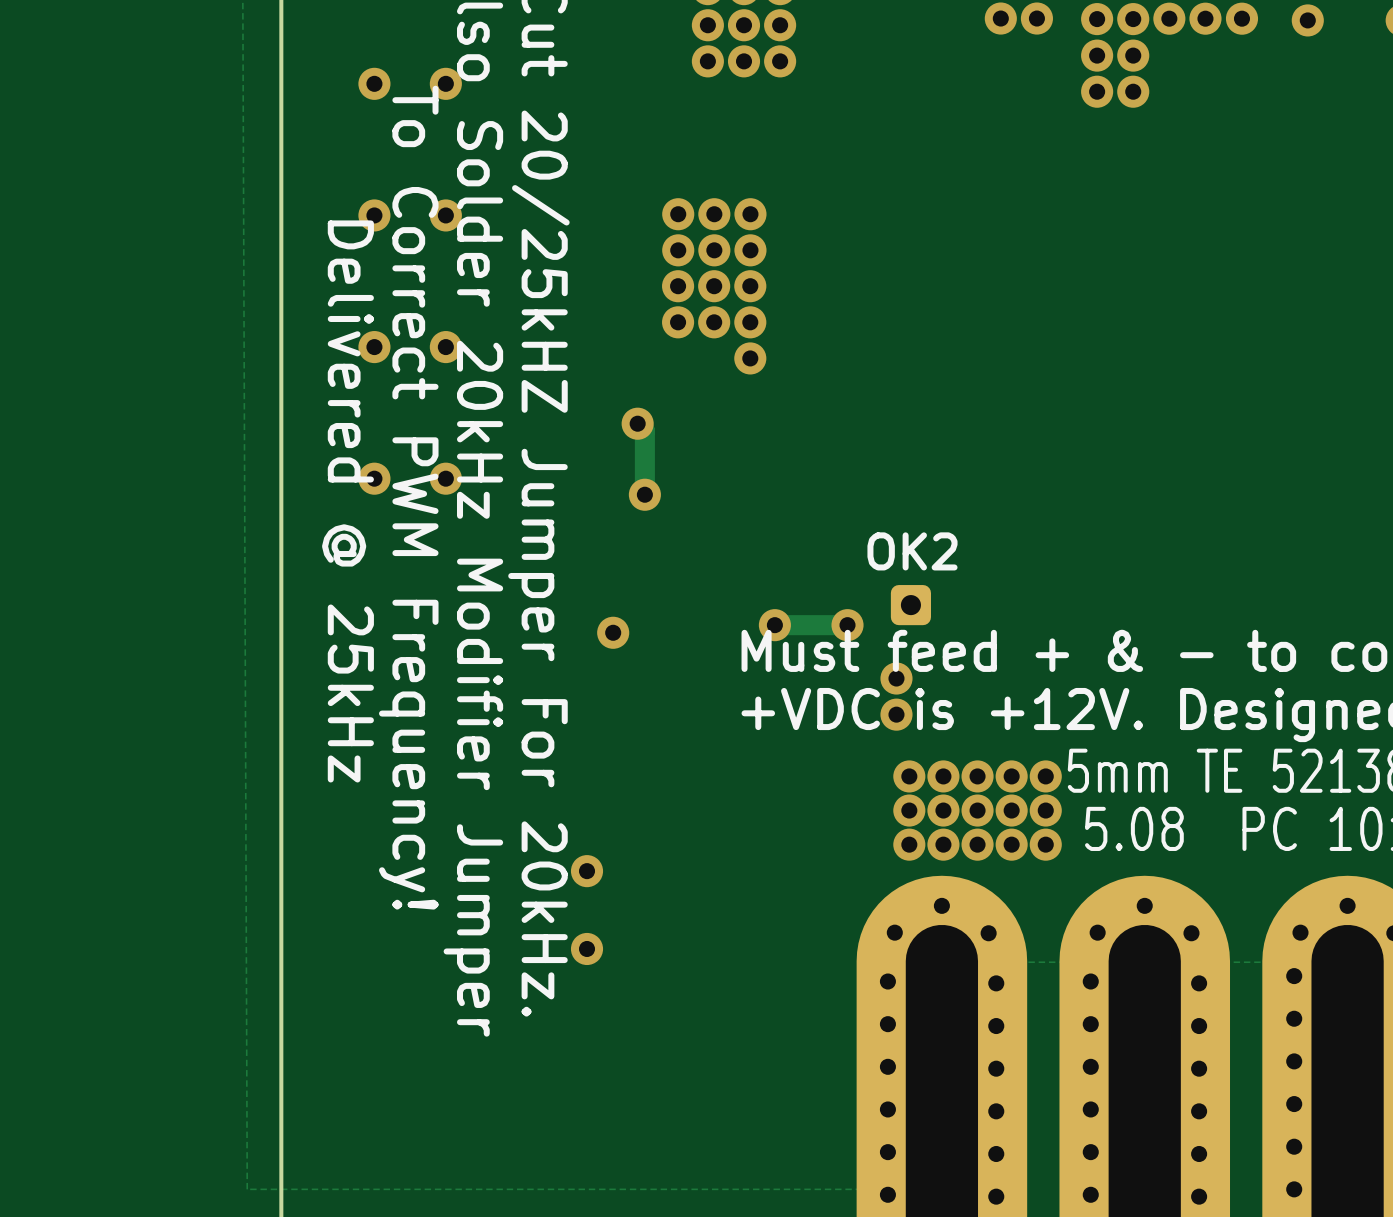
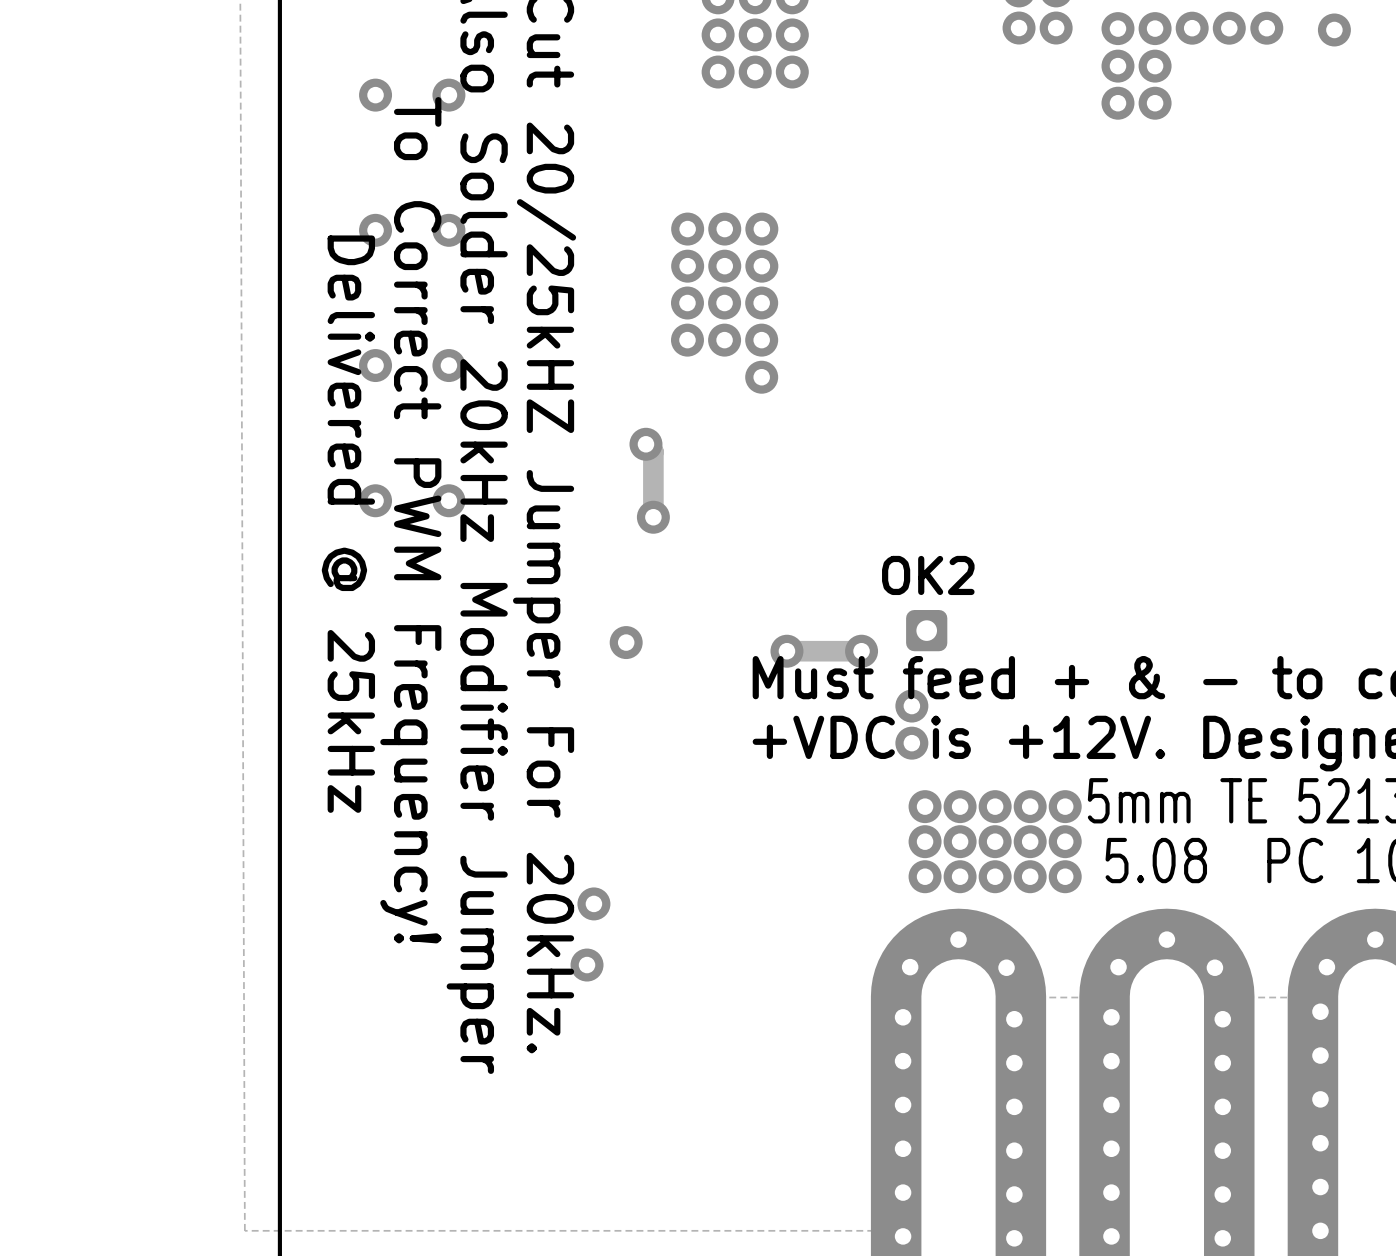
via position: (613, 632) -> (626, 642)
via position: (587, 948) -> (587, 965)

